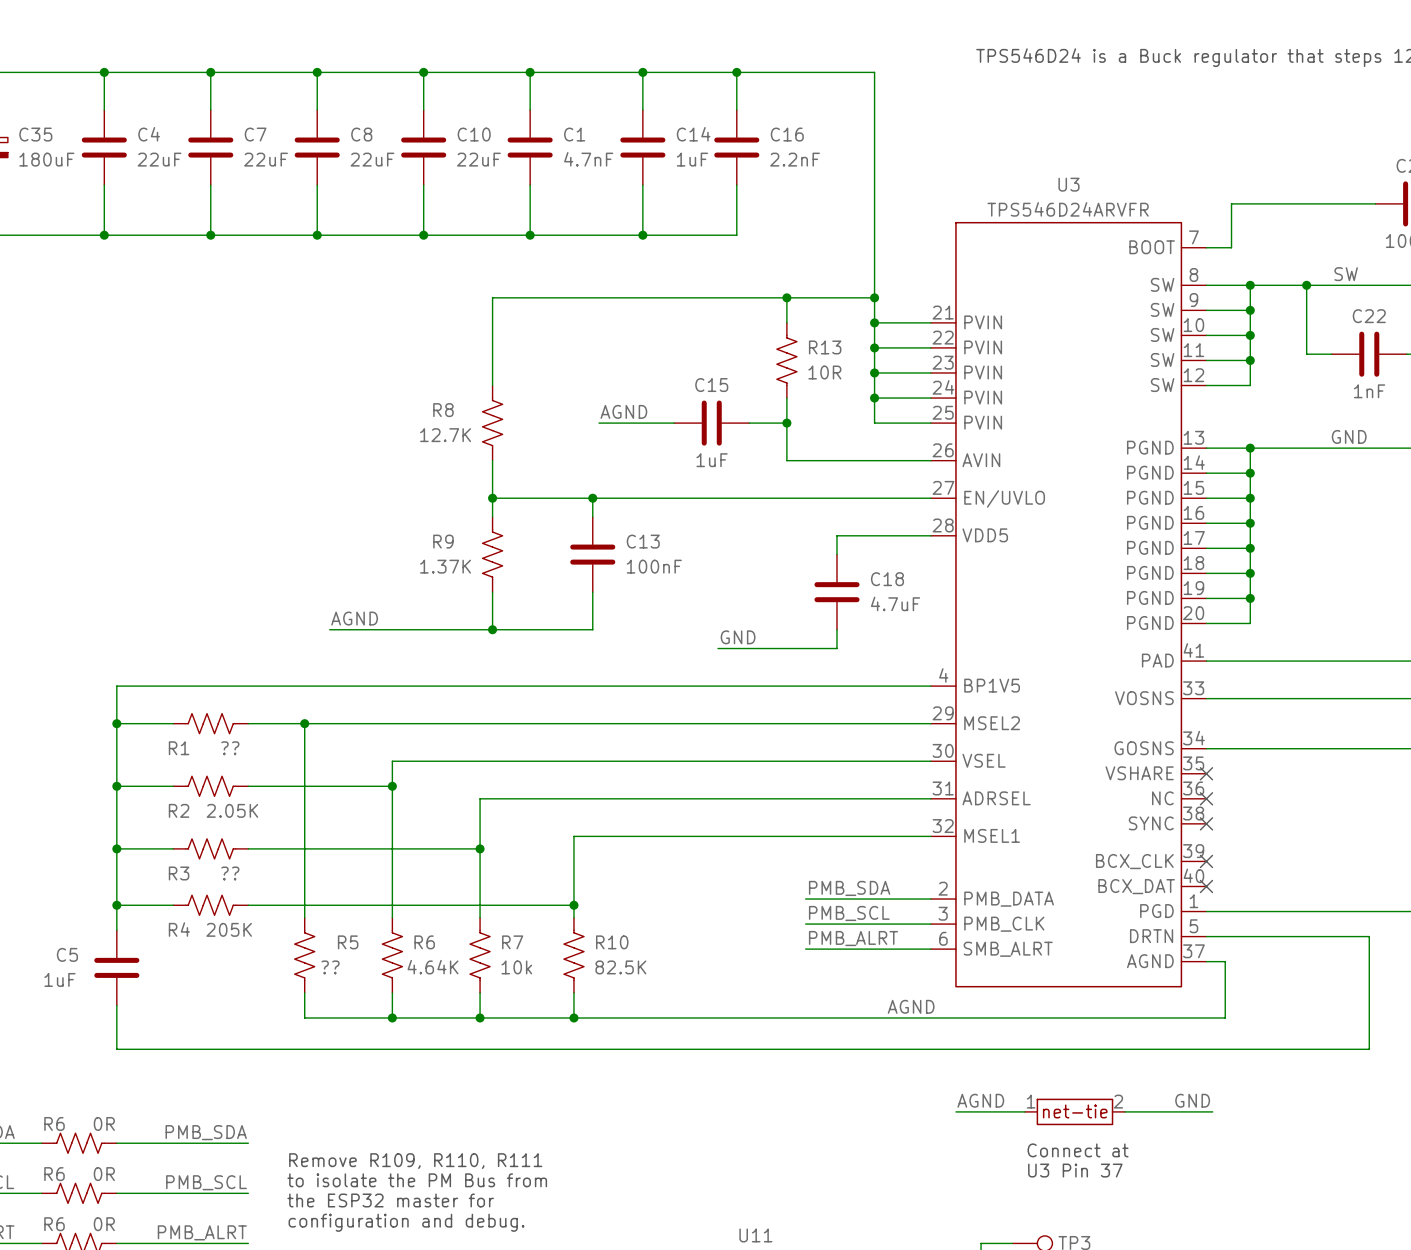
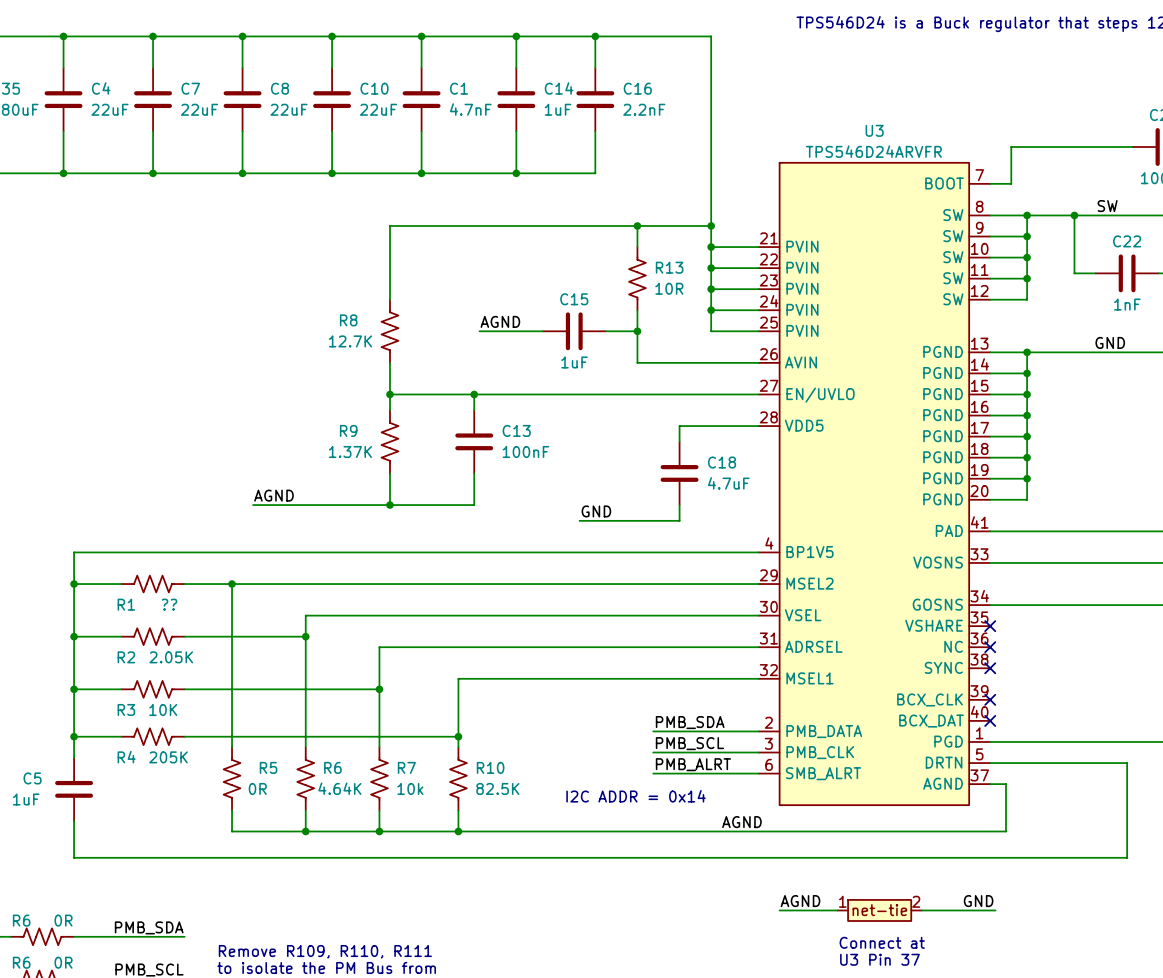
R3 value: ?? (230, 873) -> 10K (163, 710)
R5 value: ?? (330, 967) -> 0R (257, 788)
text: none -> I2C ADDR = 0x14 (636, 796)

